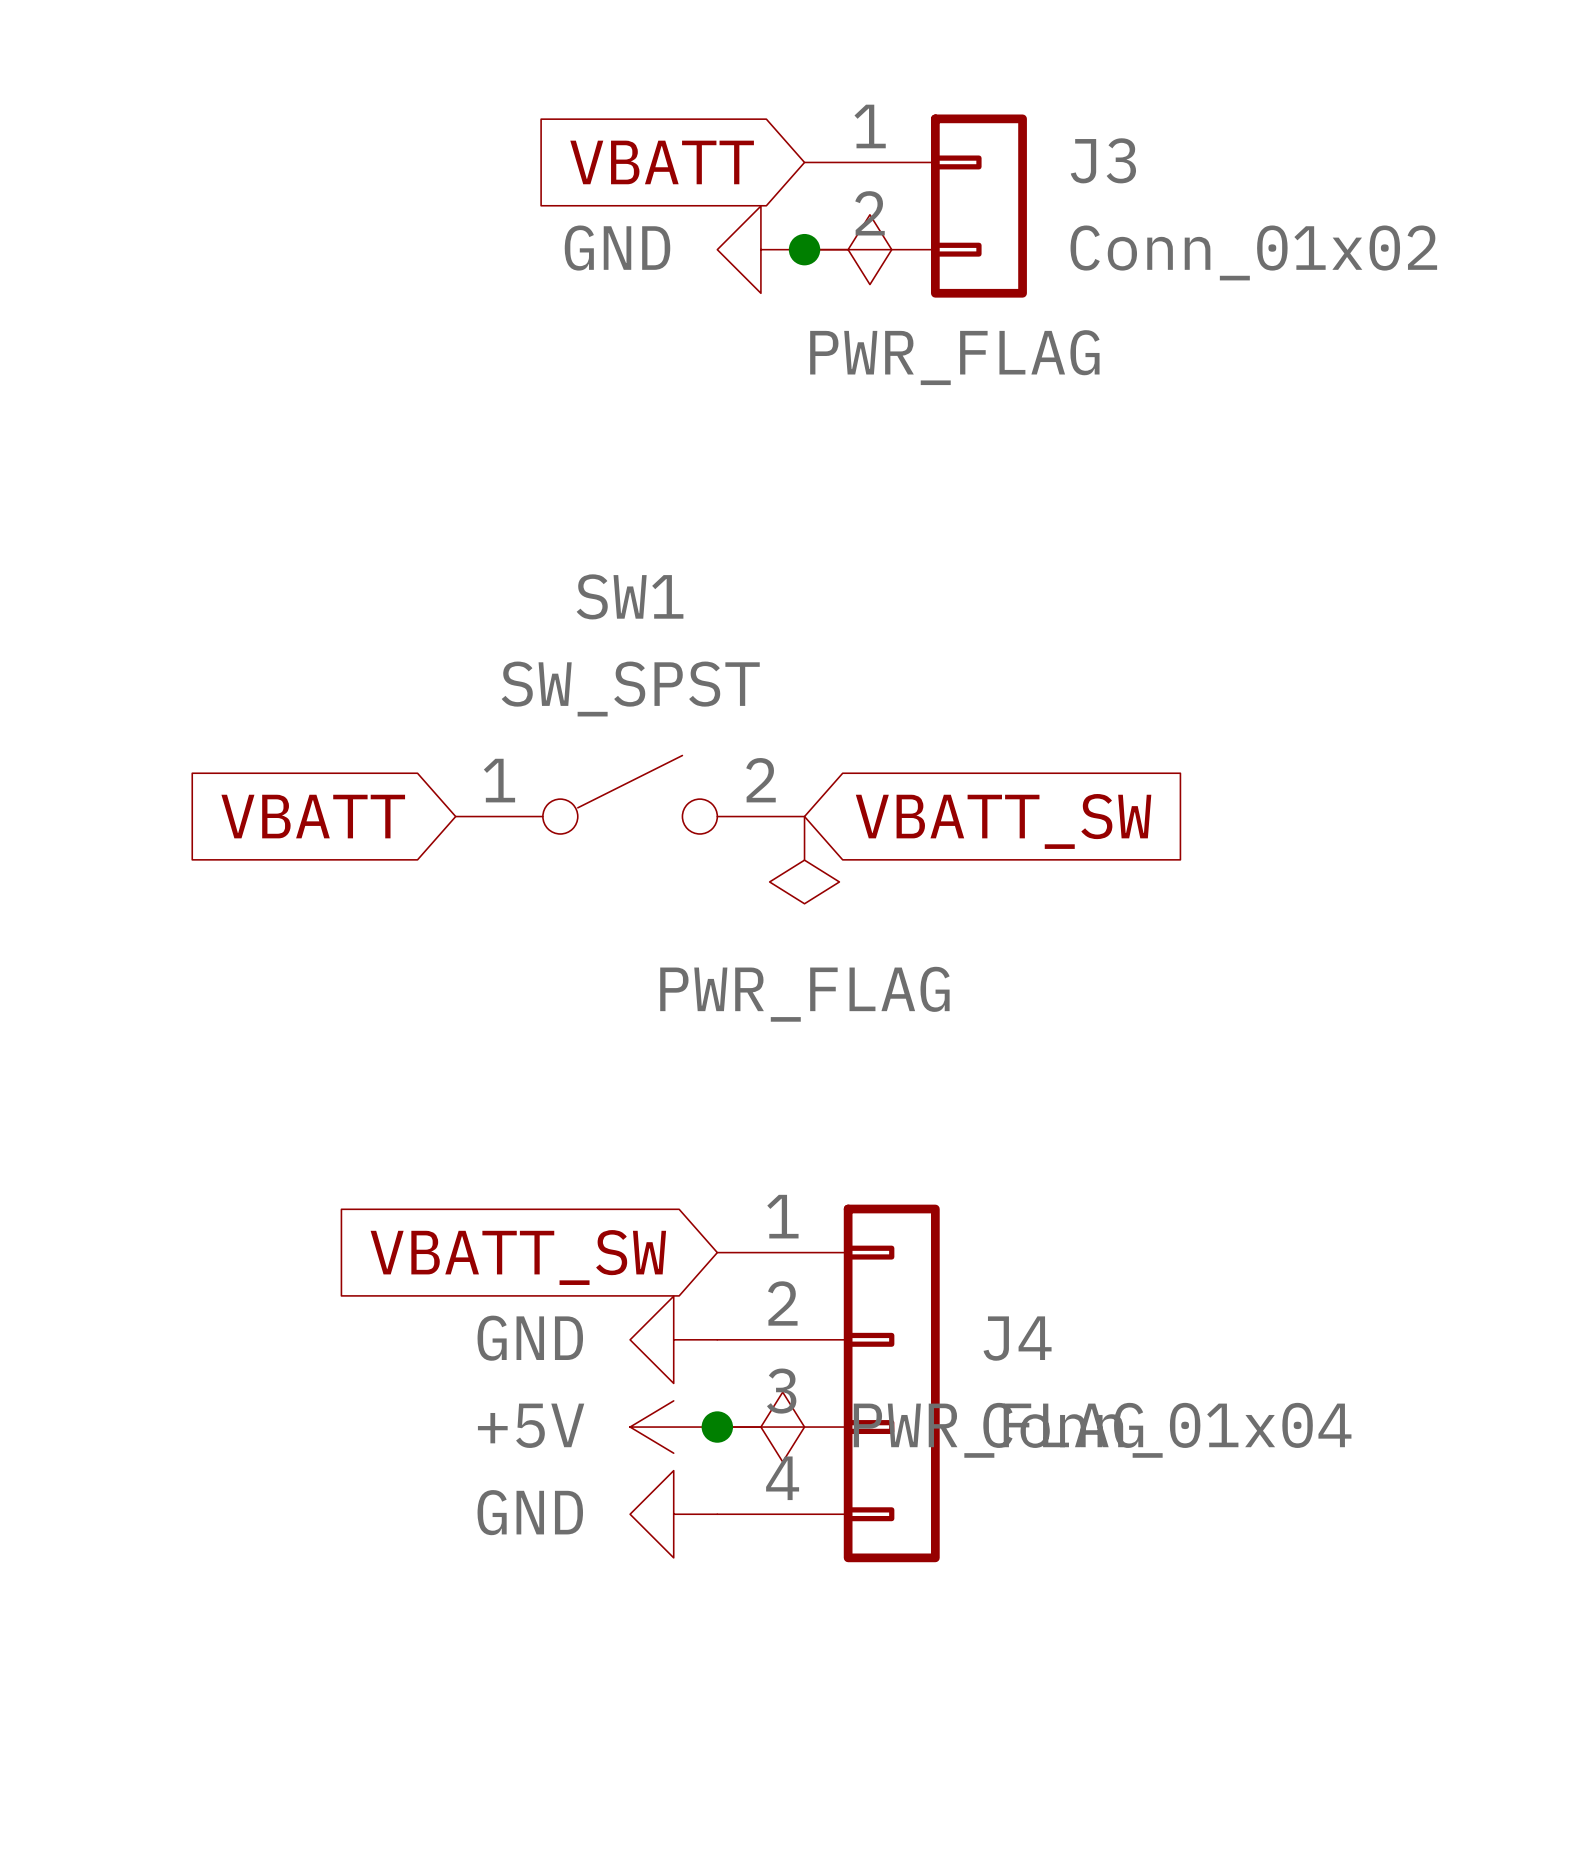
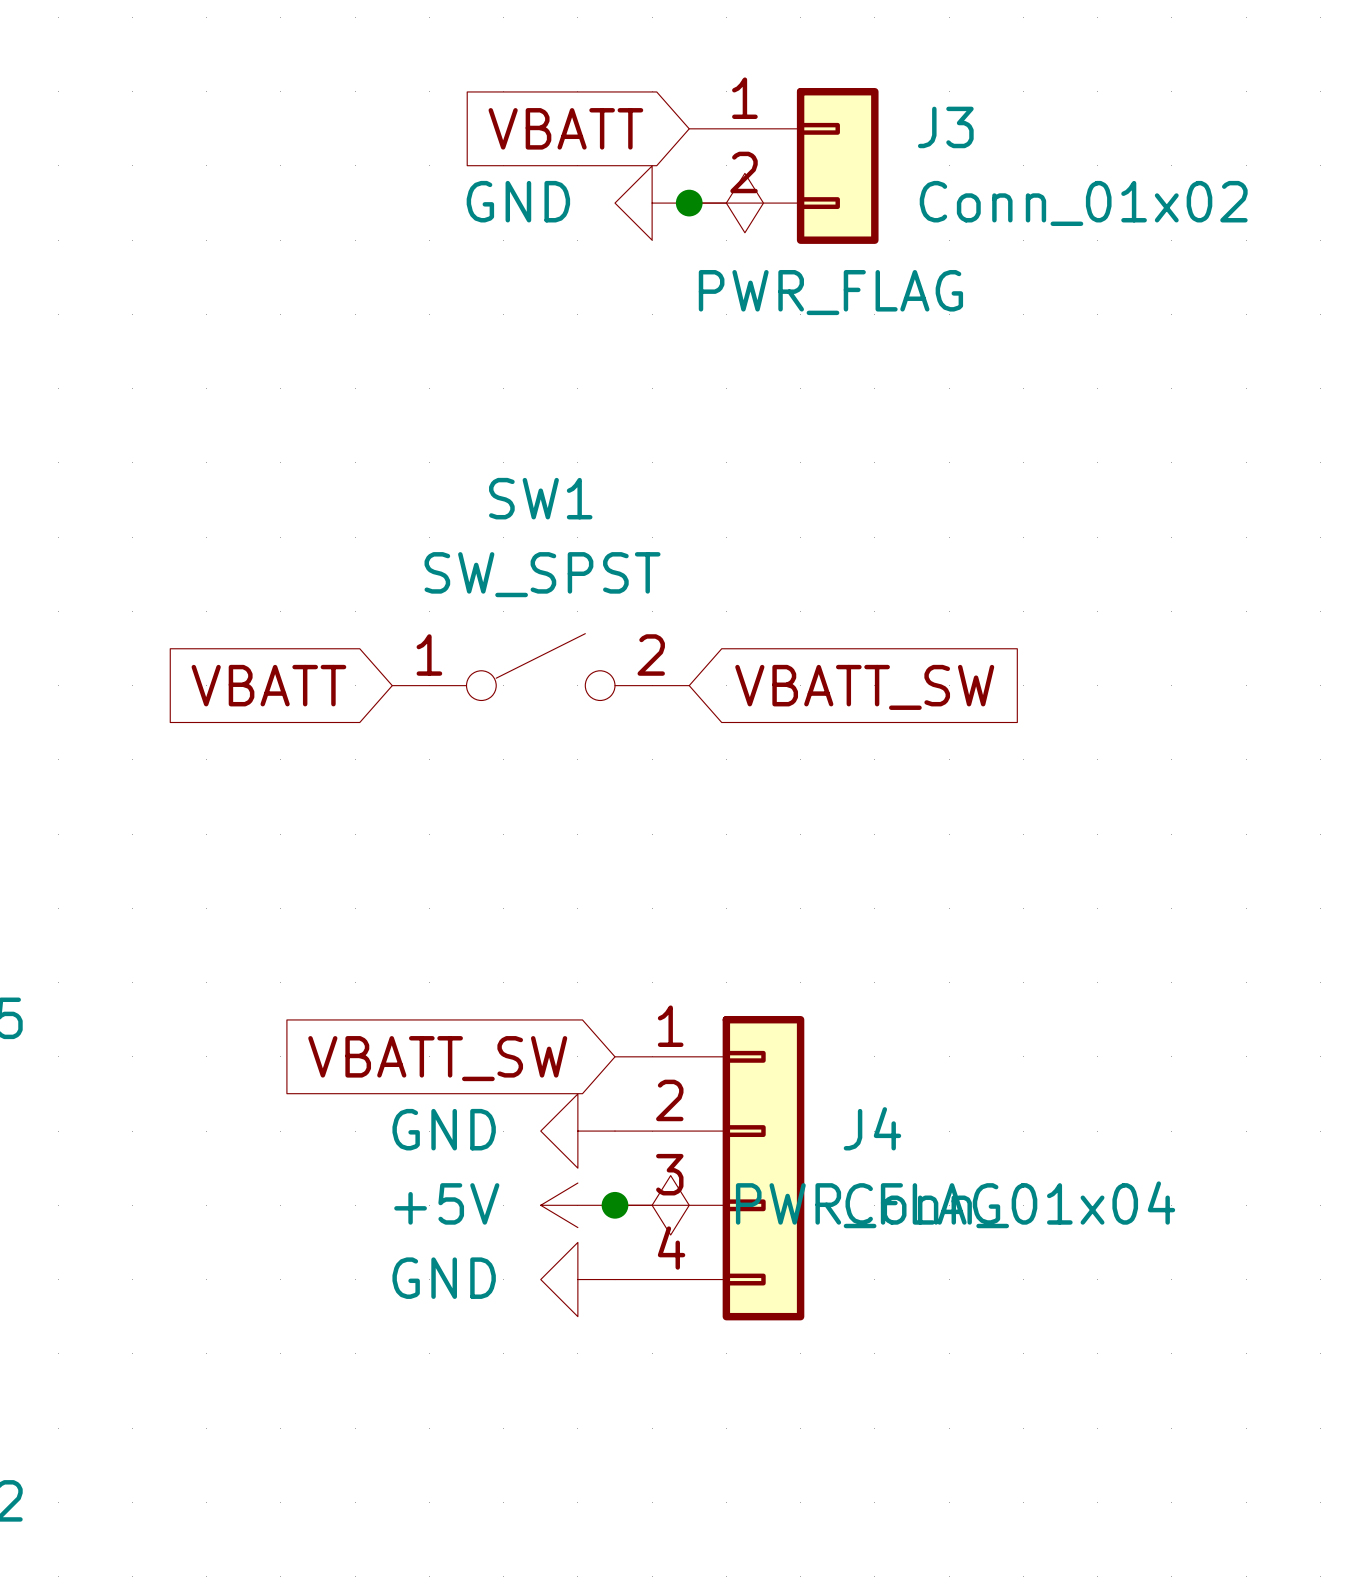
power symbol: PWR_FLAG (804, 860) -> none

